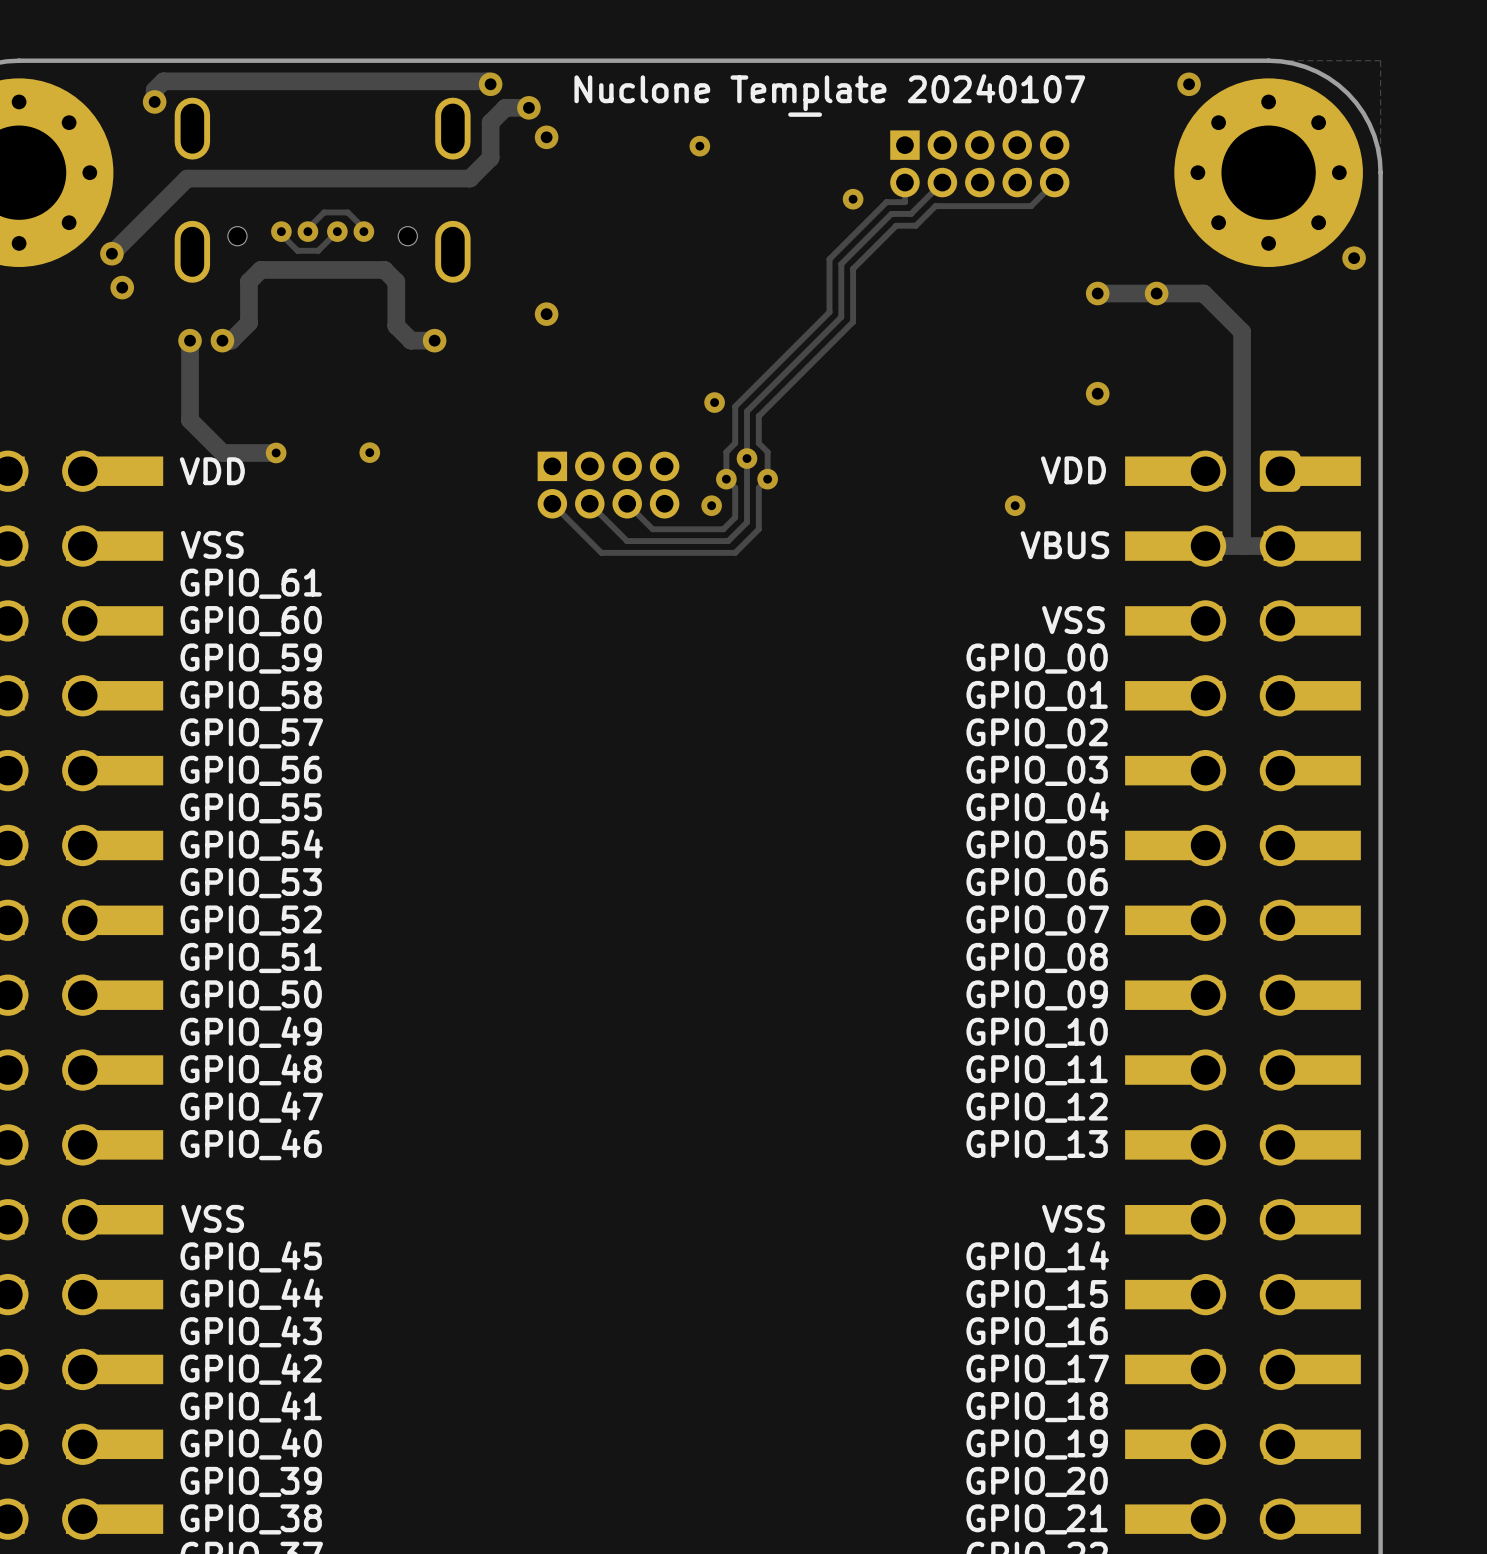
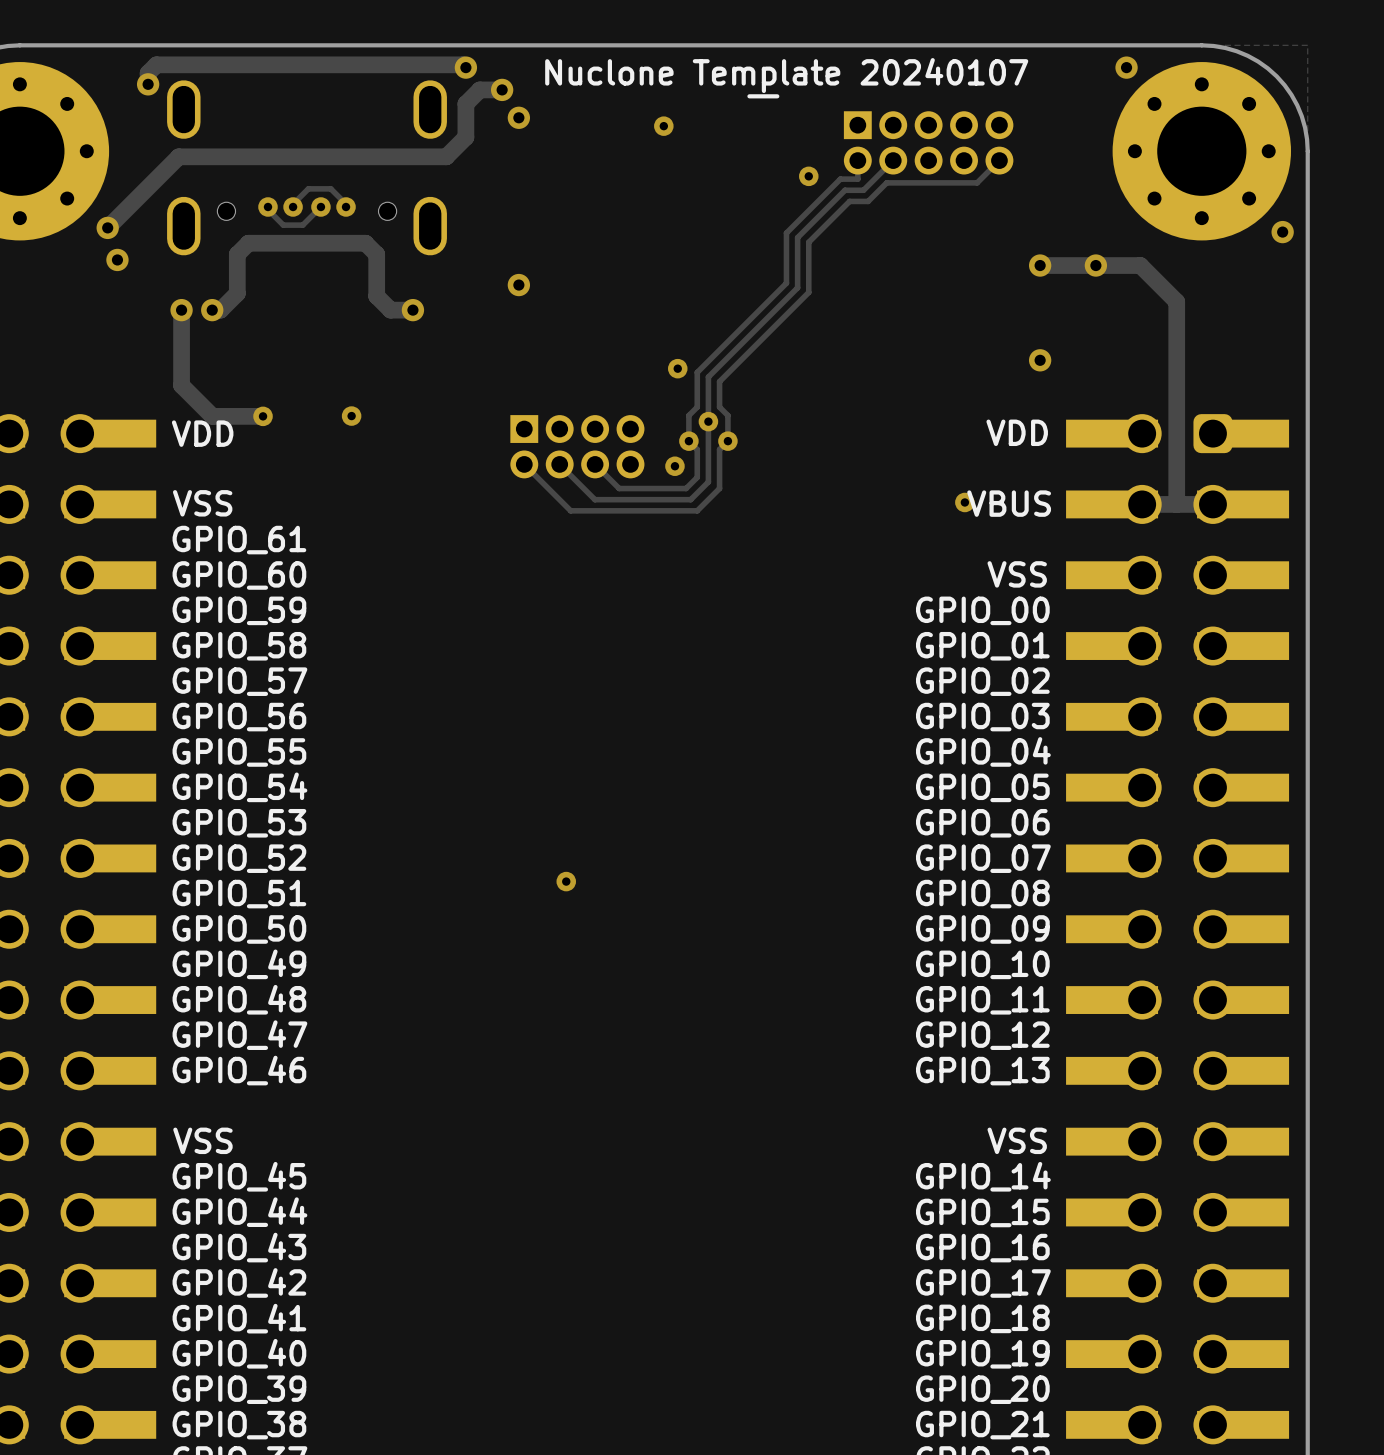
via position: (1015, 505) -> (964, 502)
via: none -> (566, 881)

